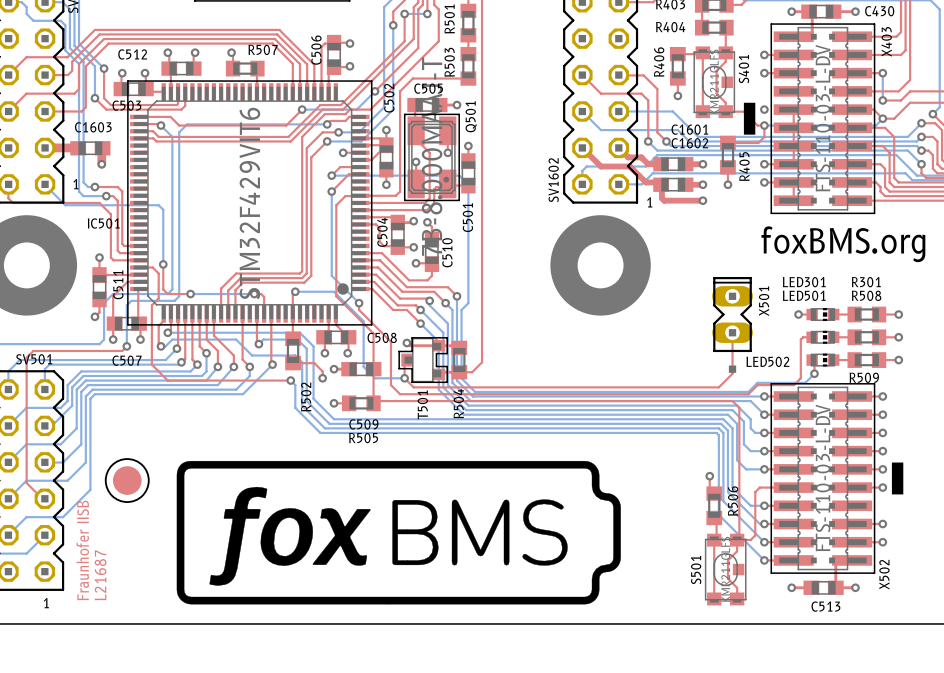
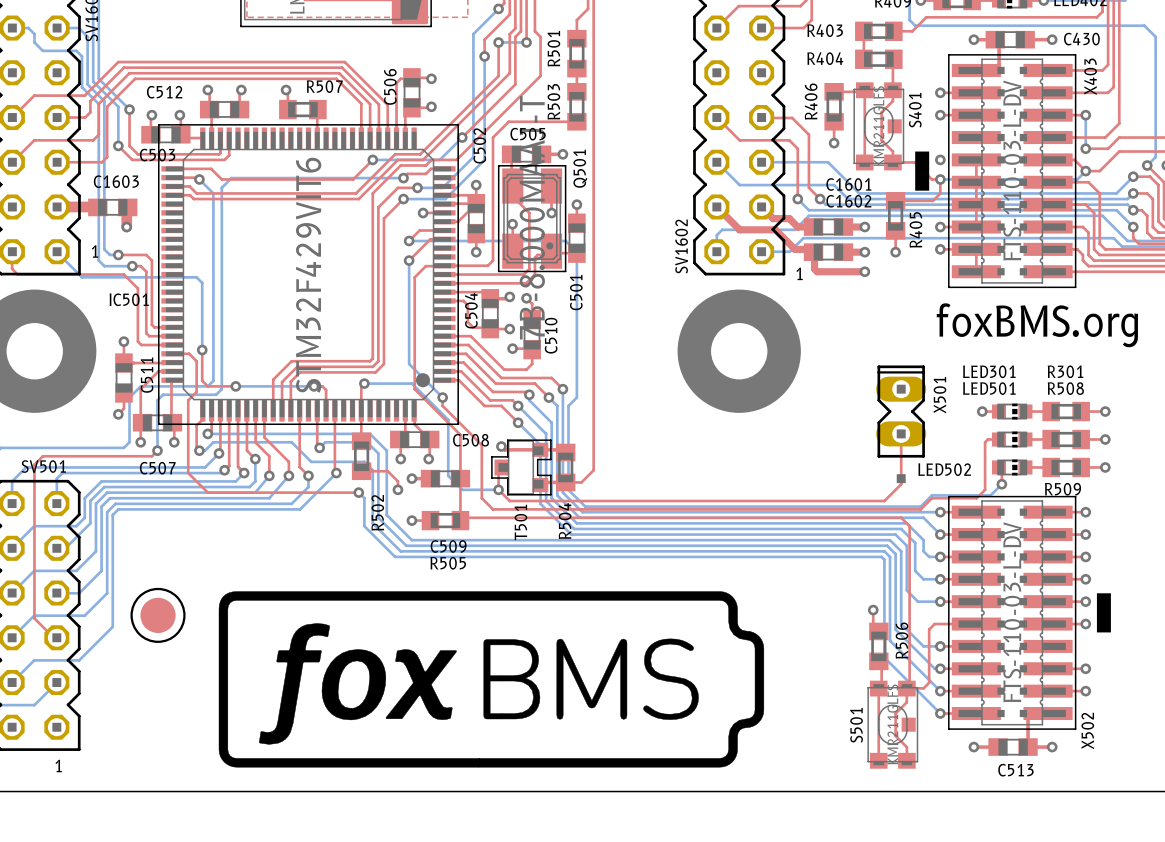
text: Fraunhofer IISB (82, 550) -> none
text: L21687 (100, 575) -> none

